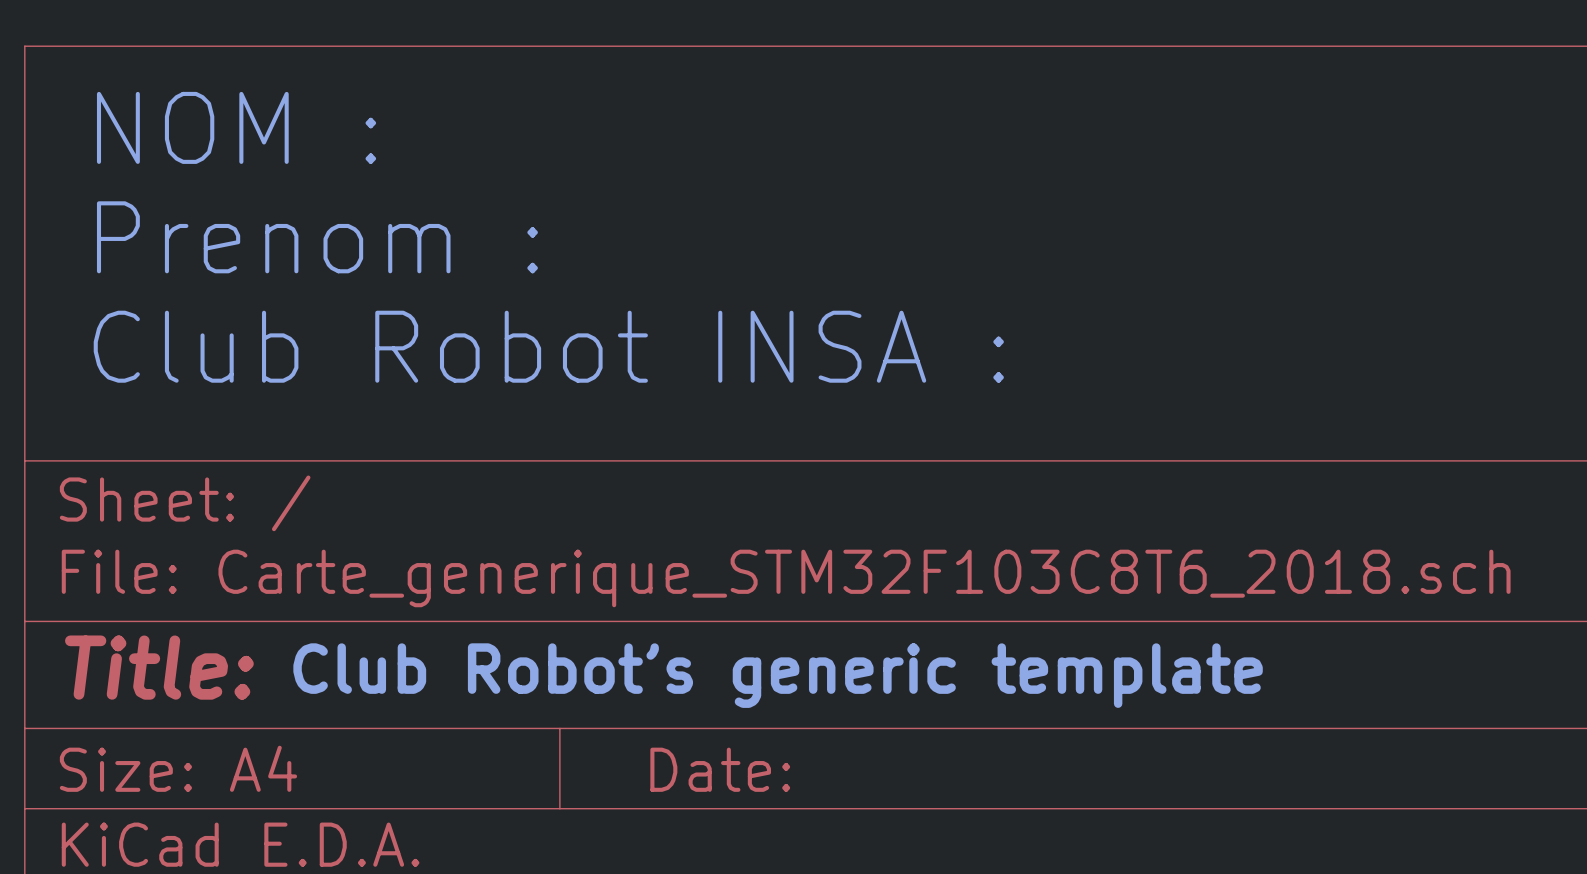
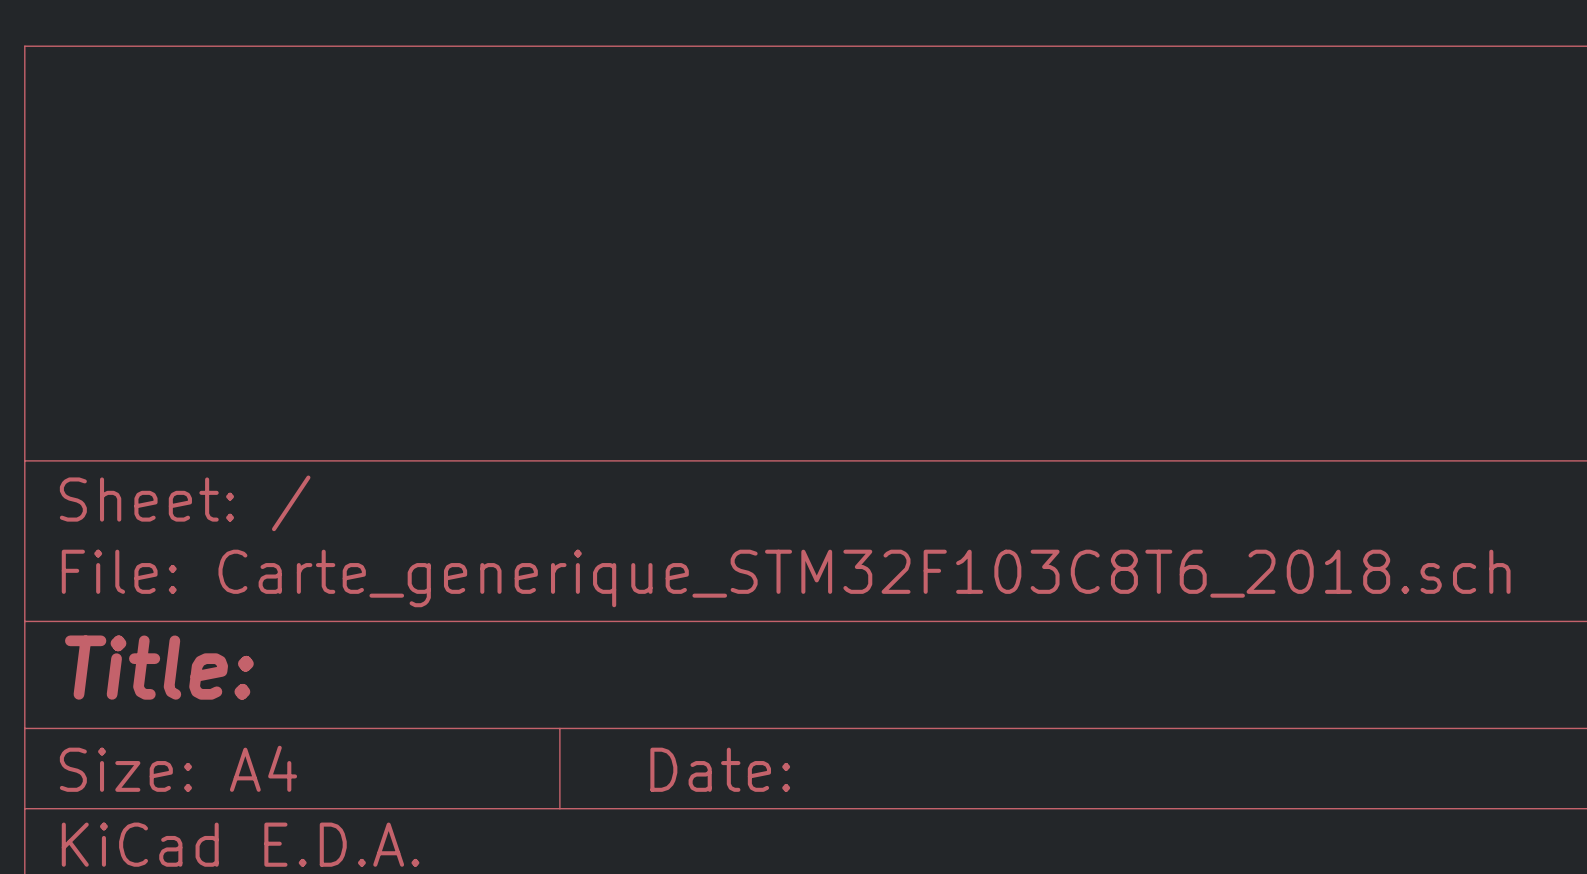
text: NOM : (236, 127) -> none
text: Prenom : (317, 237) -> none
text: Club Robot INSA : (548, 346) -> none
text: Club Robot’s generic template (778, 675) -> none

